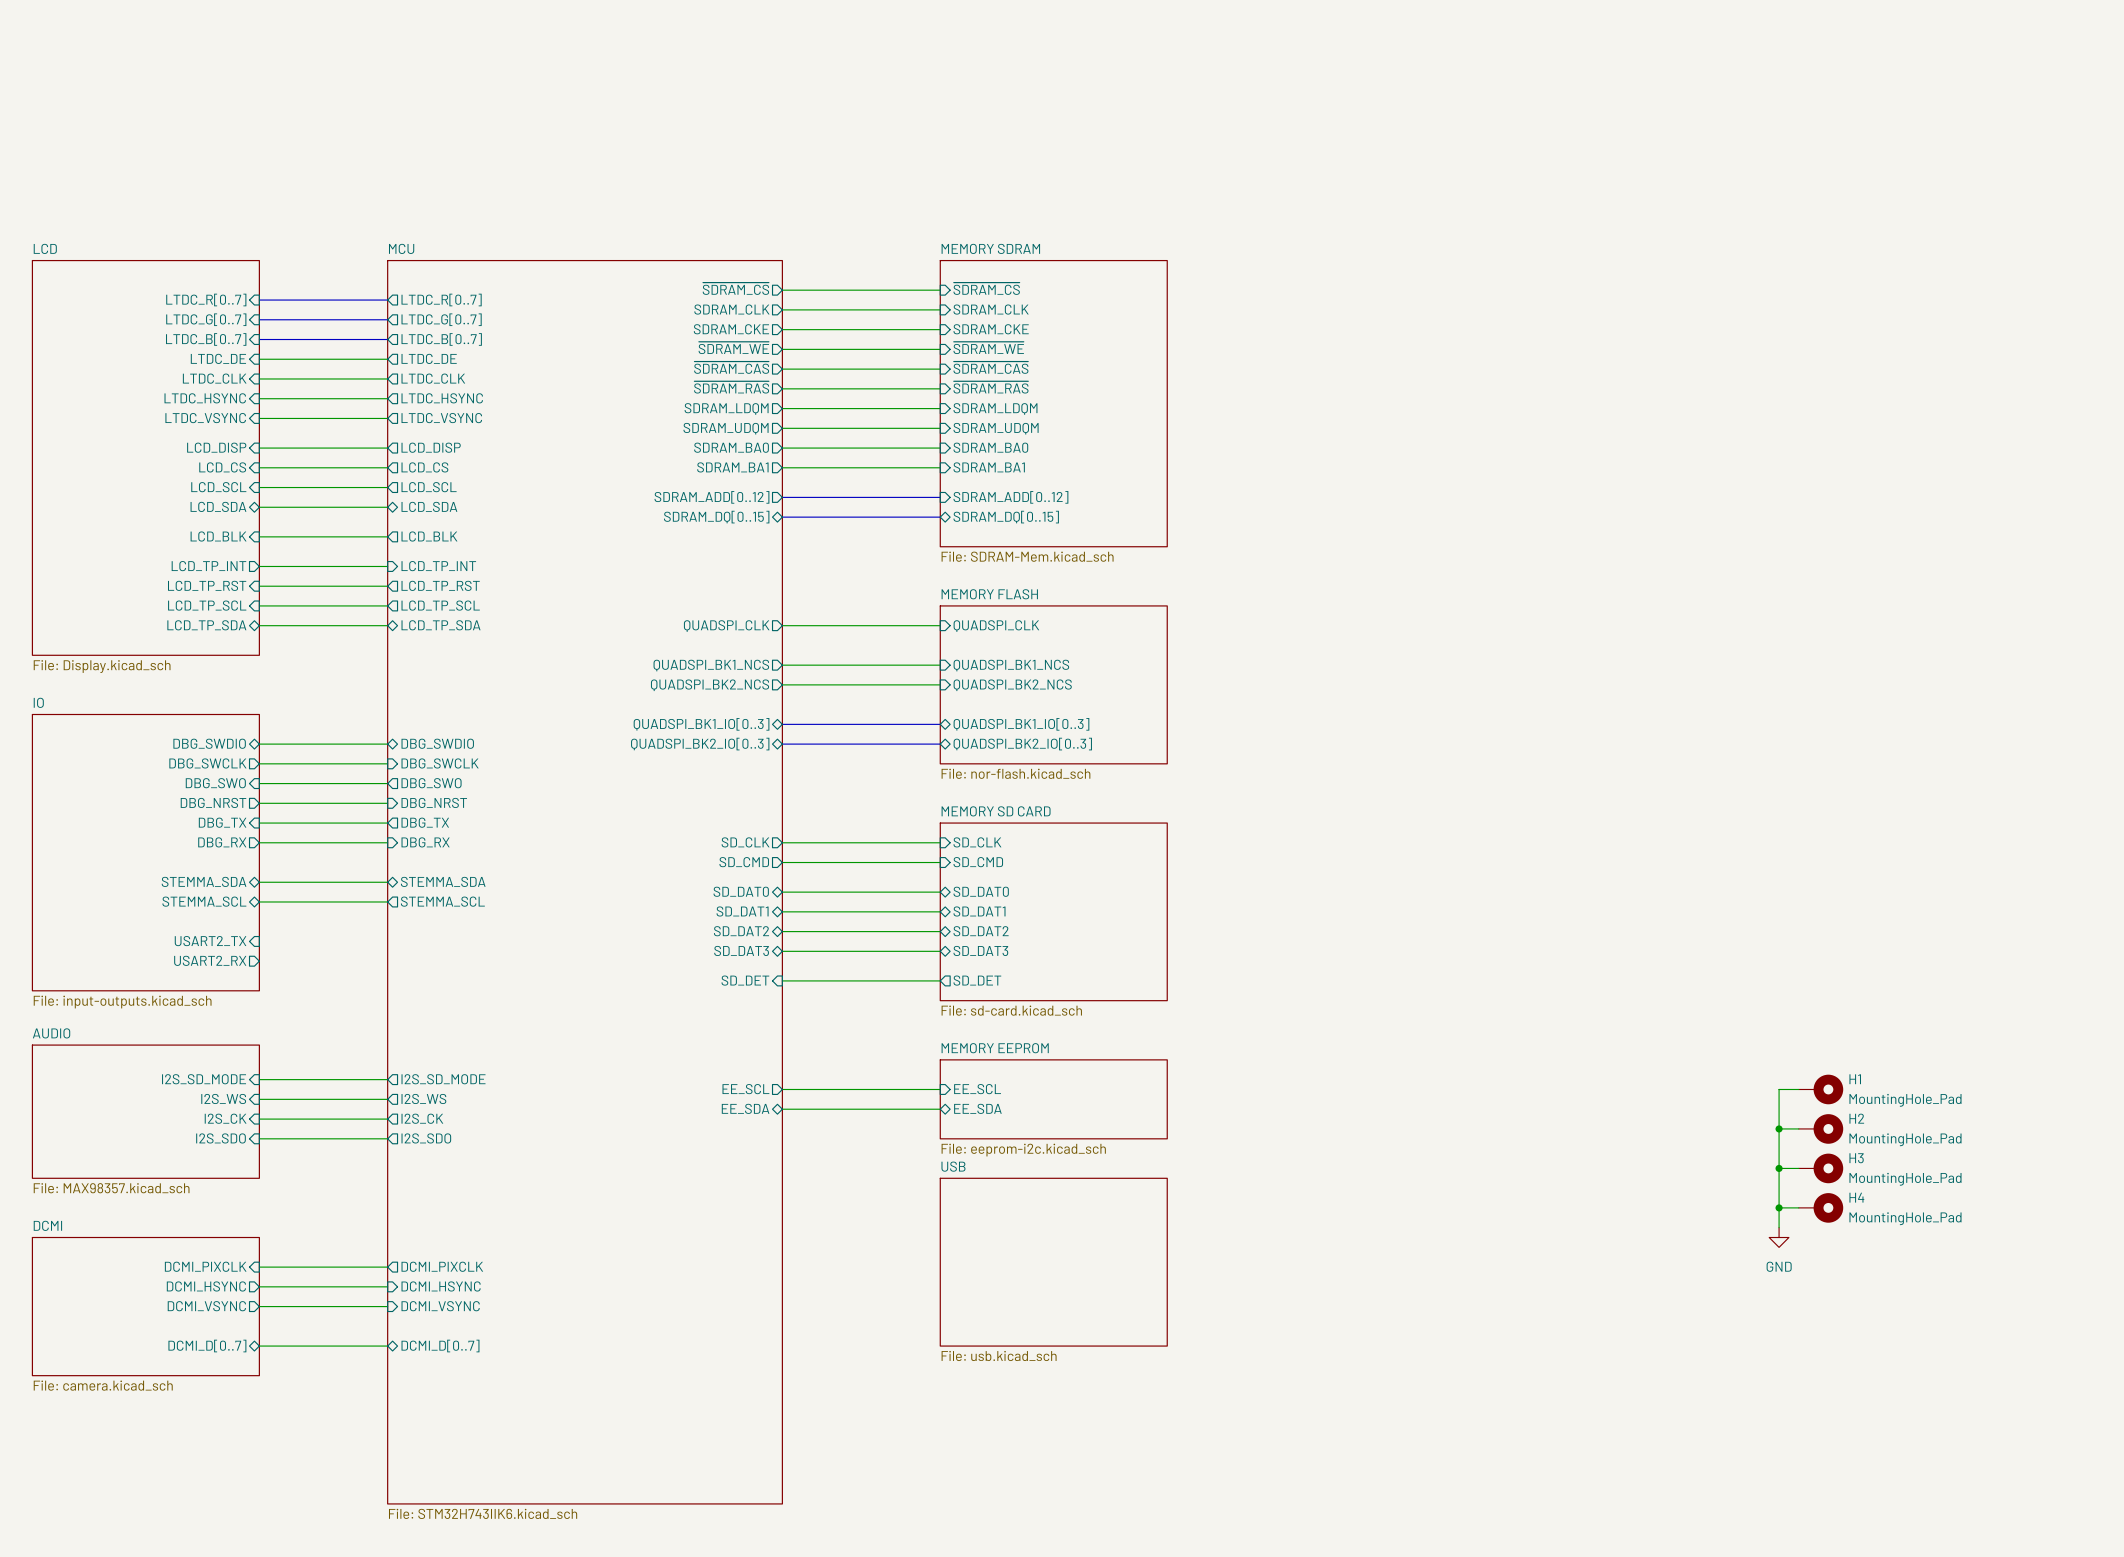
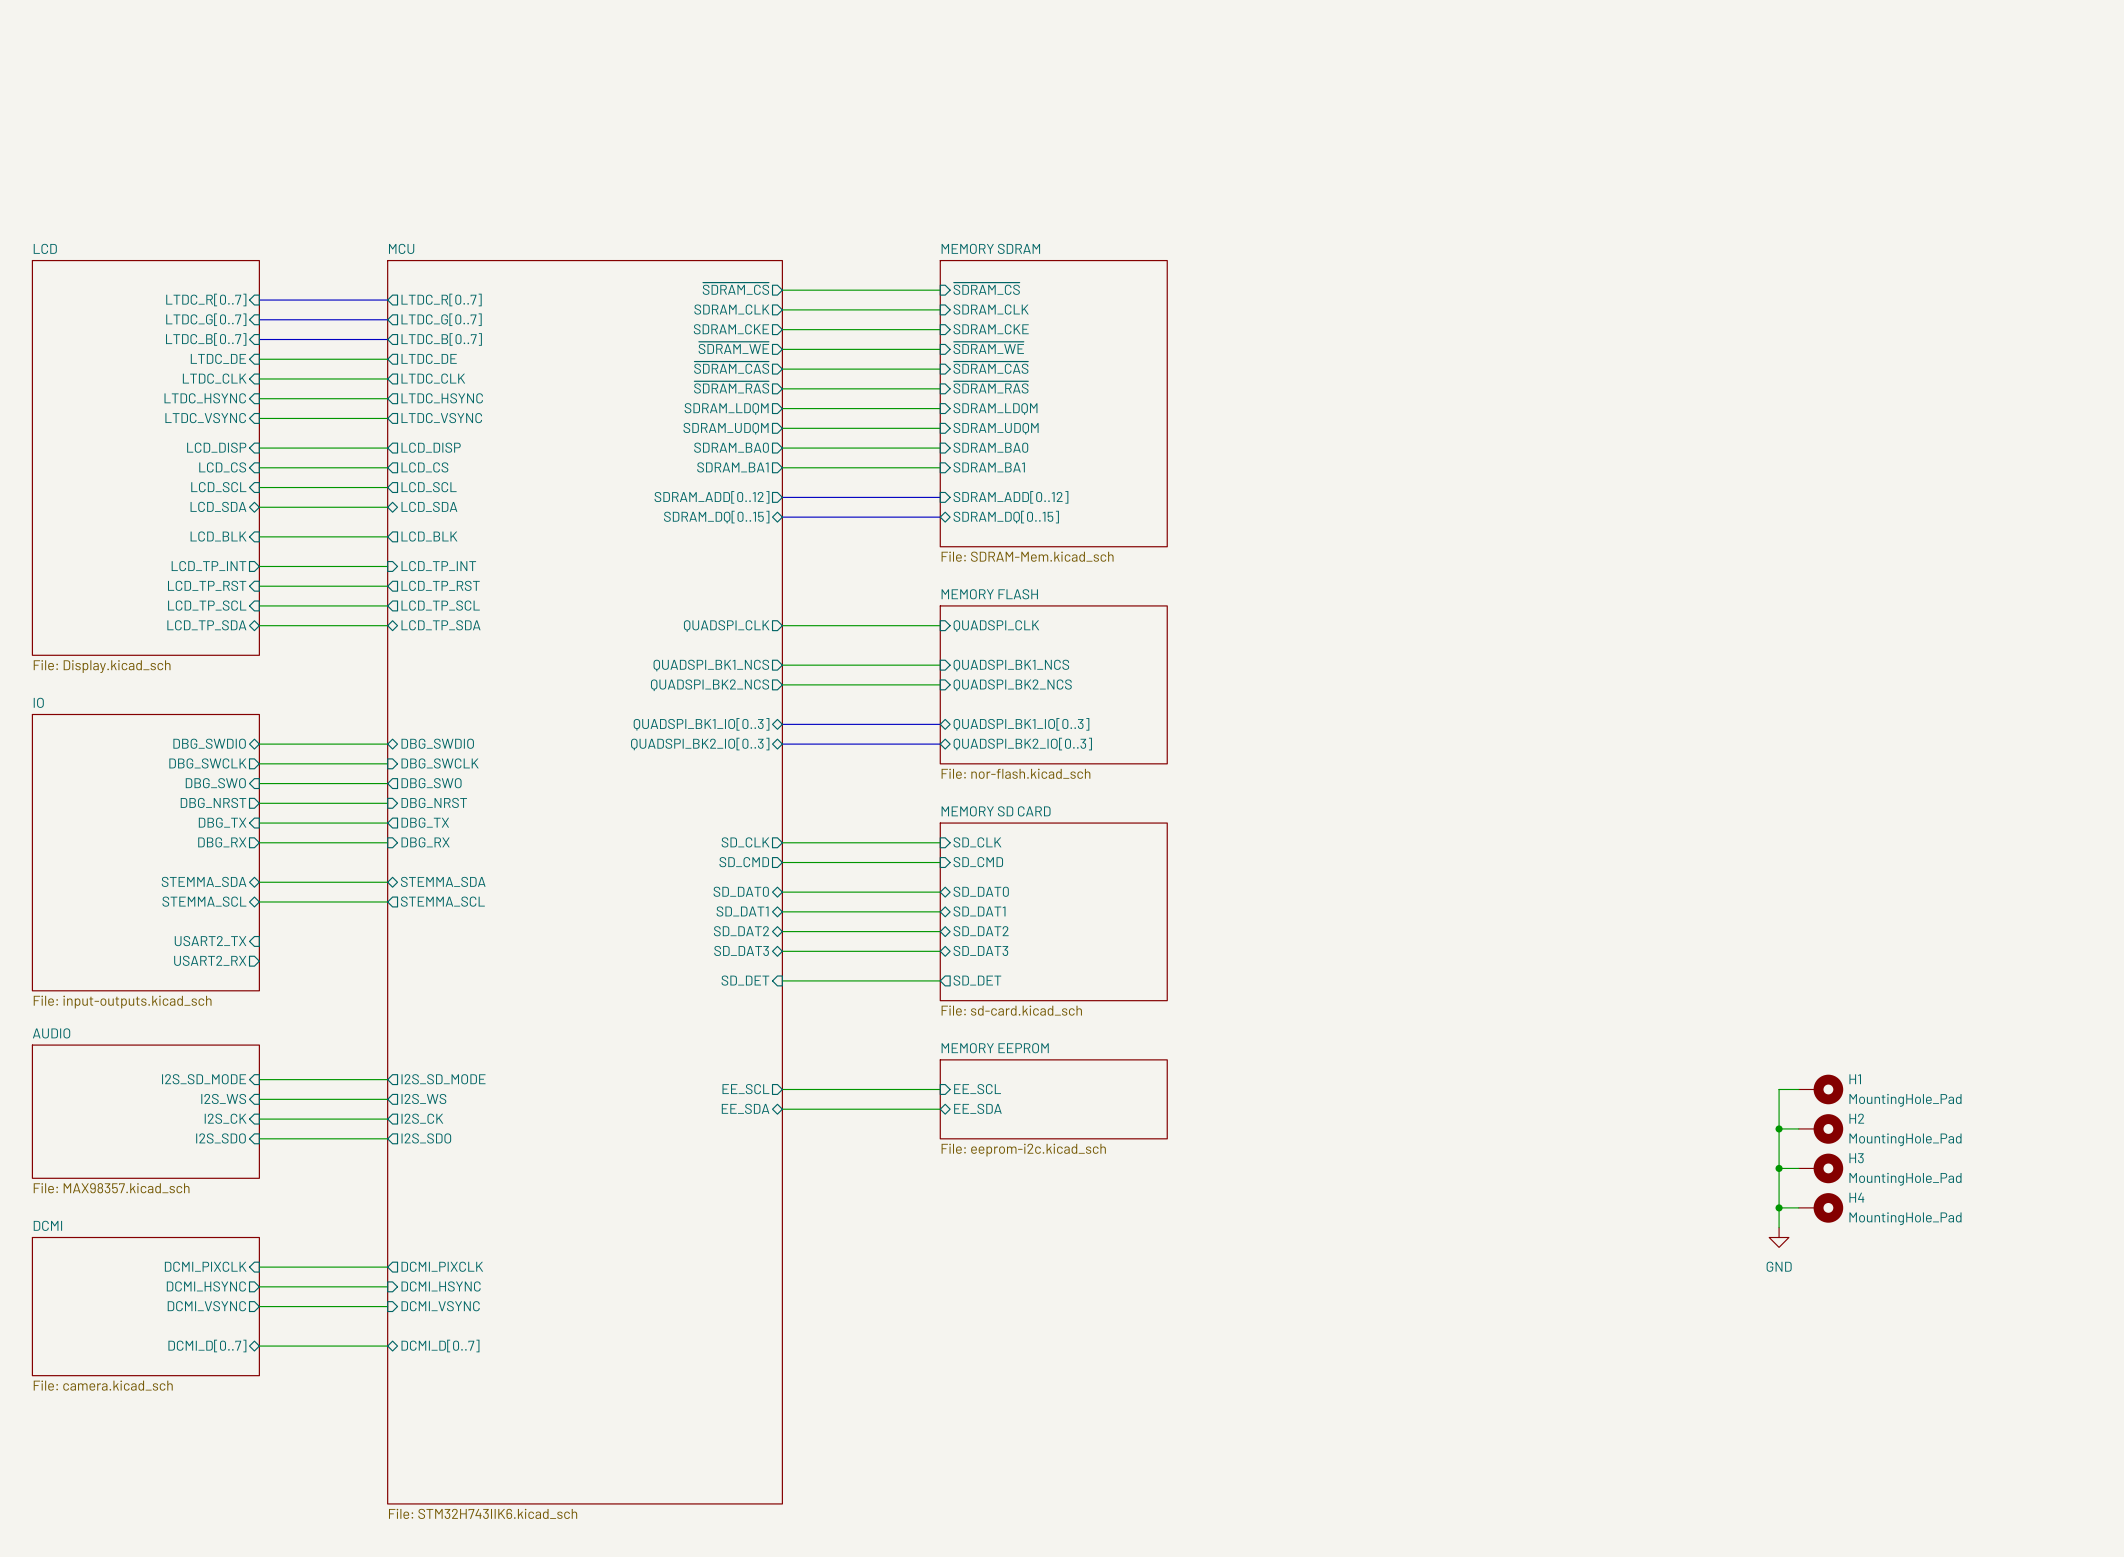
sheet USB: File: usb.kicad_sch (1053, 1262) -> none

